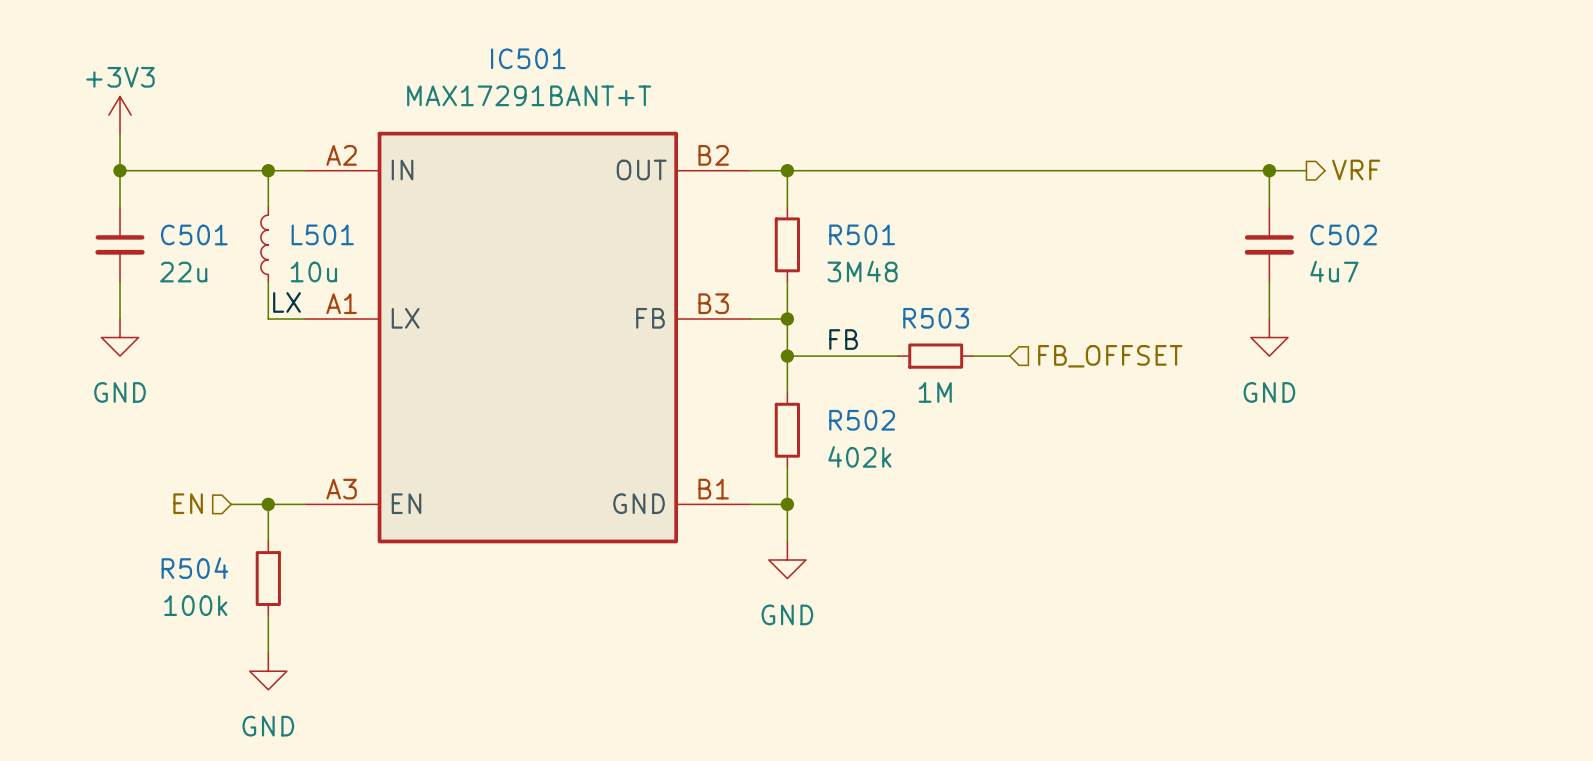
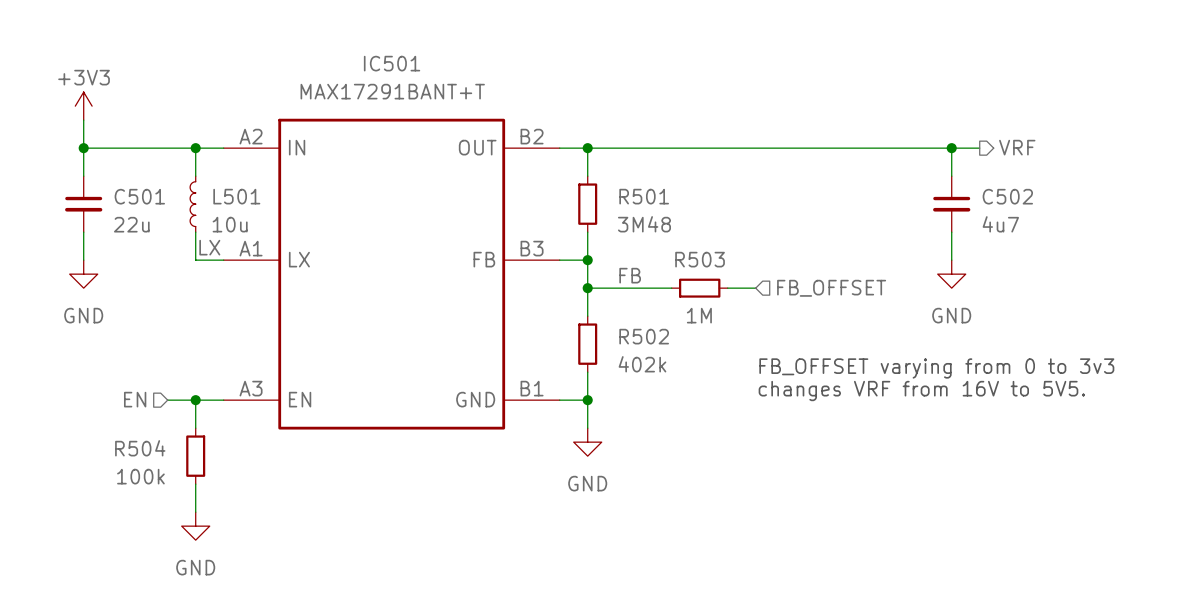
text: none -> FB_OFFSET varying from 0 to 3v3 (936, 368)
text: none -> changes VRF from 16V to 5V5. (921, 391)

